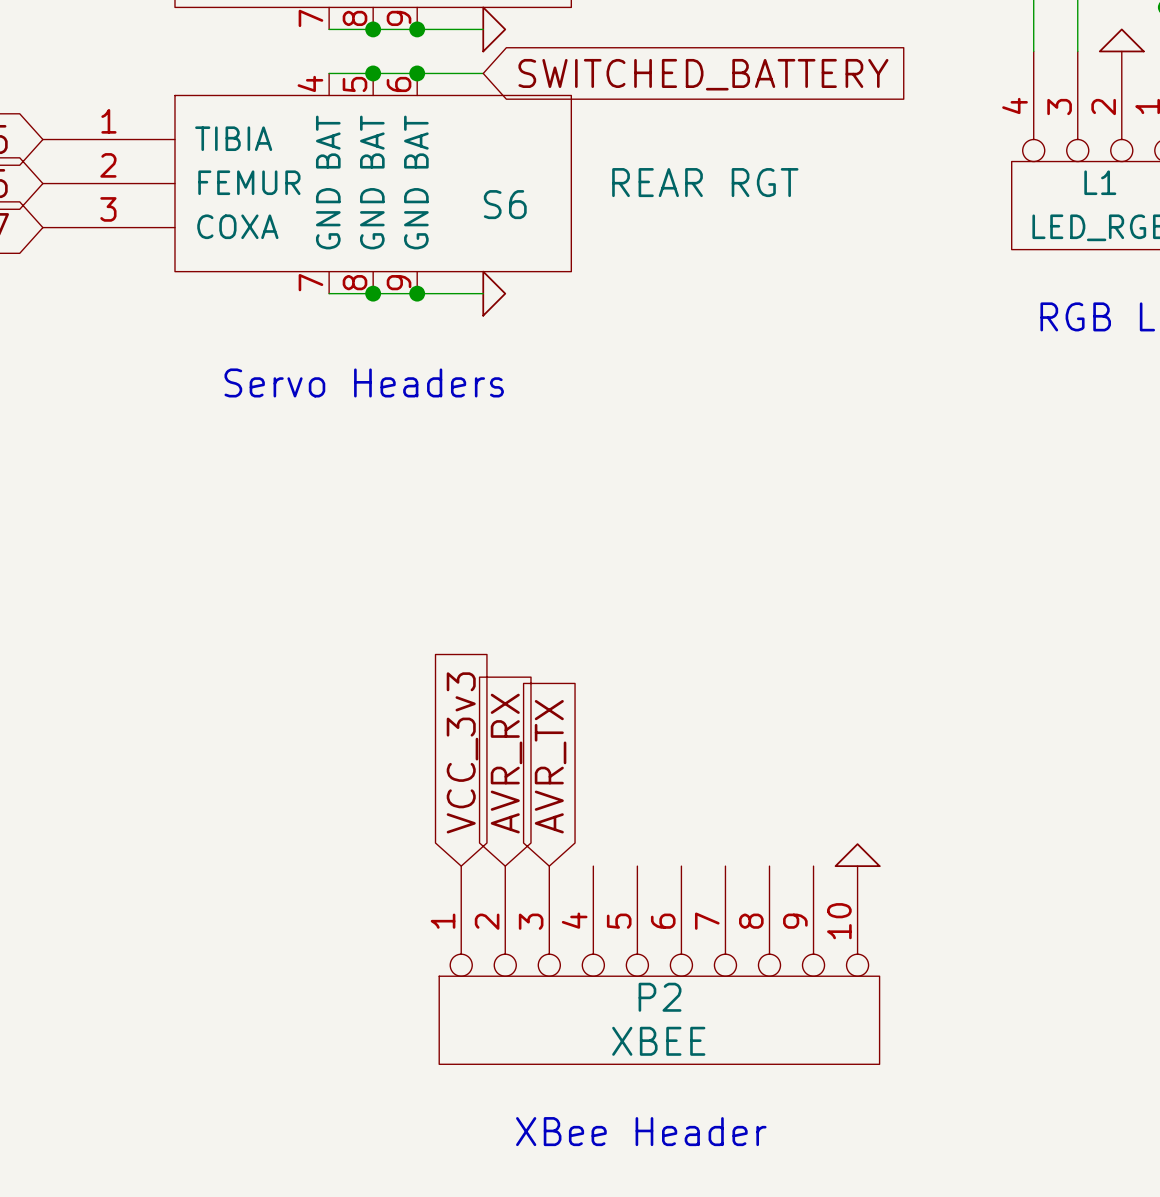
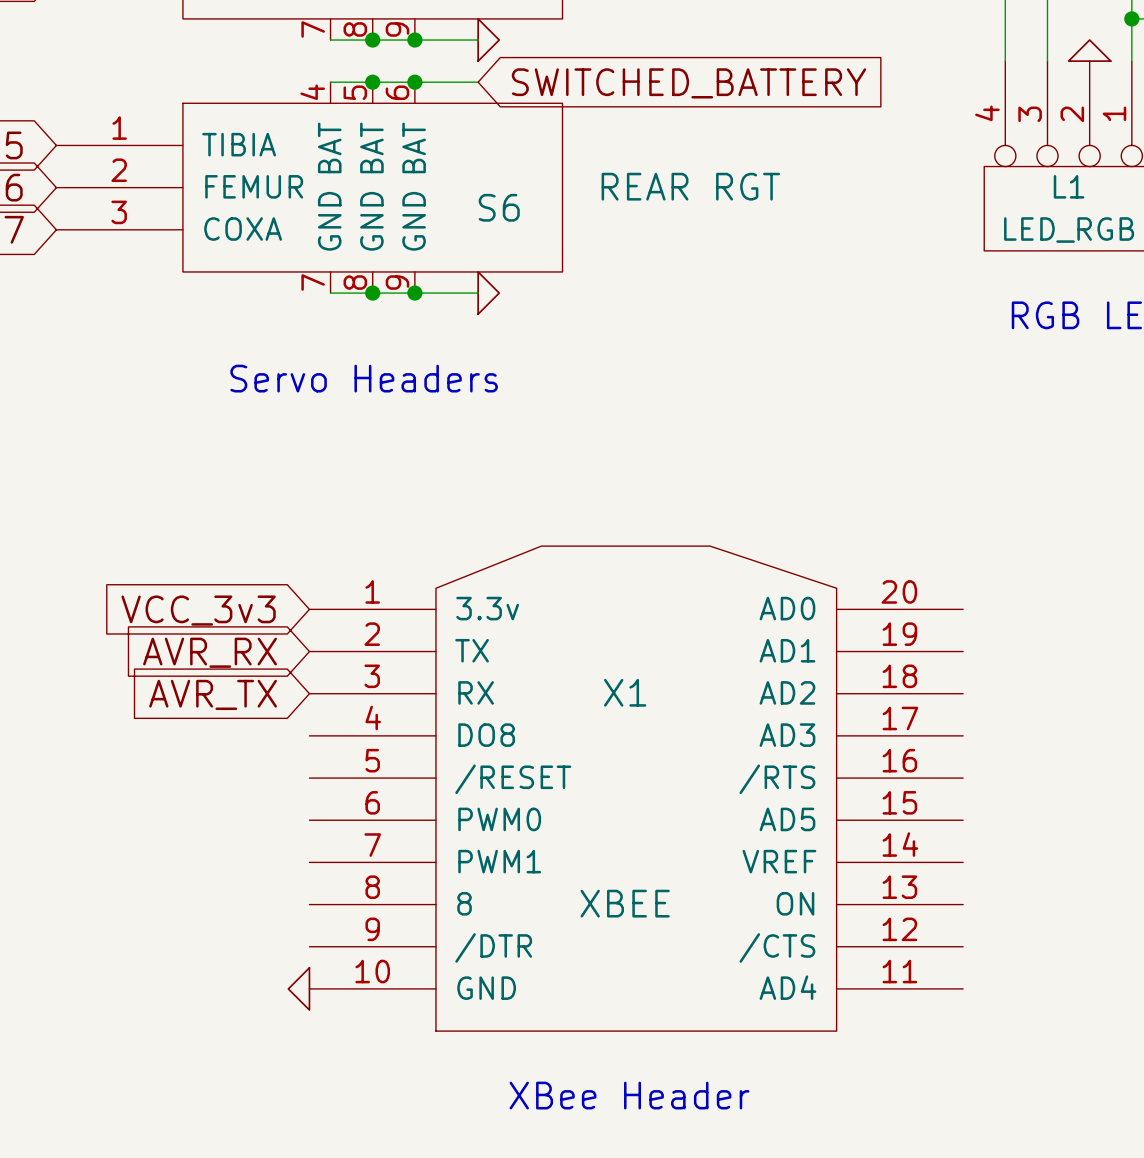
global label rotation: 0° (462, 752) -> 90° counterclockwise (198, 610)
global label position: VCC_3v3 (462, 752) -> VCC_3v3 (198, 610)
global label rotation: 0° (506, 763) -> 90° counterclockwise (210, 652)
global label position: AVR_RX (506, 763) -> AVR_RX (210, 652)
global label rotation: 0° (550, 766) -> 90° counterclockwise (213, 694)
global label position: AVR_TX (550, 766) -> AVR_TX (213, 694)
X1: none -> XBEE (636, 788)
power symbol: (857, 855) -> none
P2: XBEE (659, 965) -> none
power symbol: none -> (298, 988)

